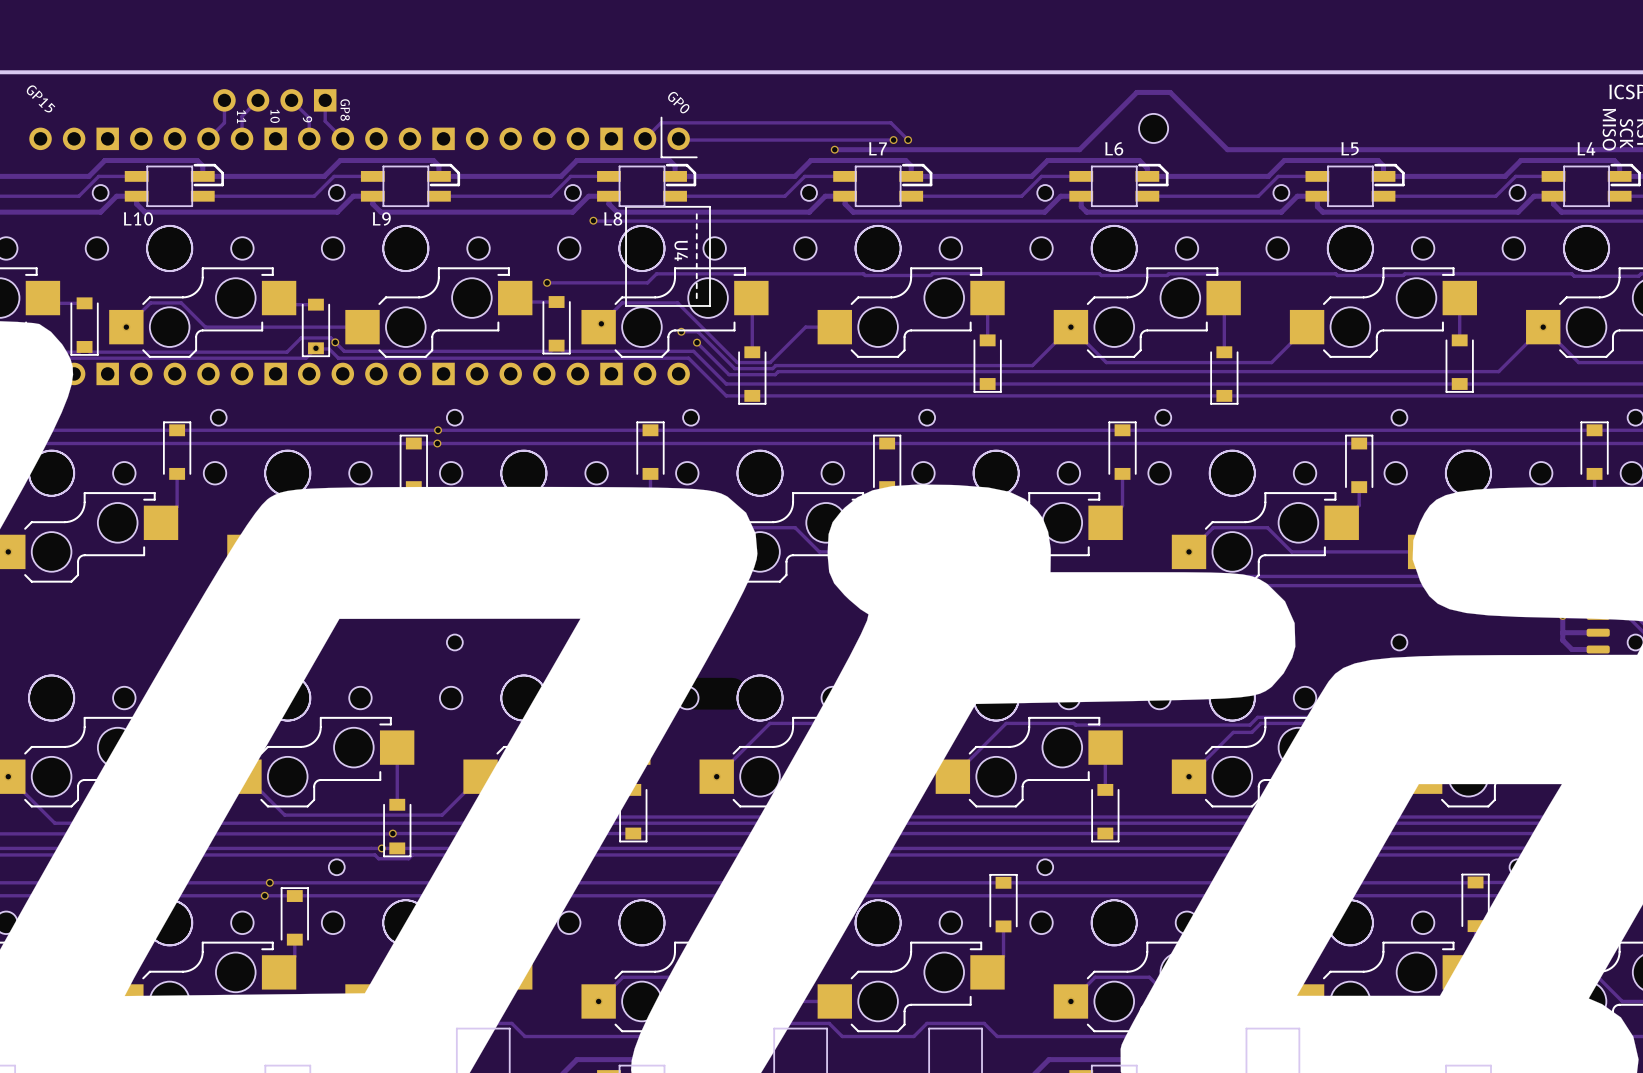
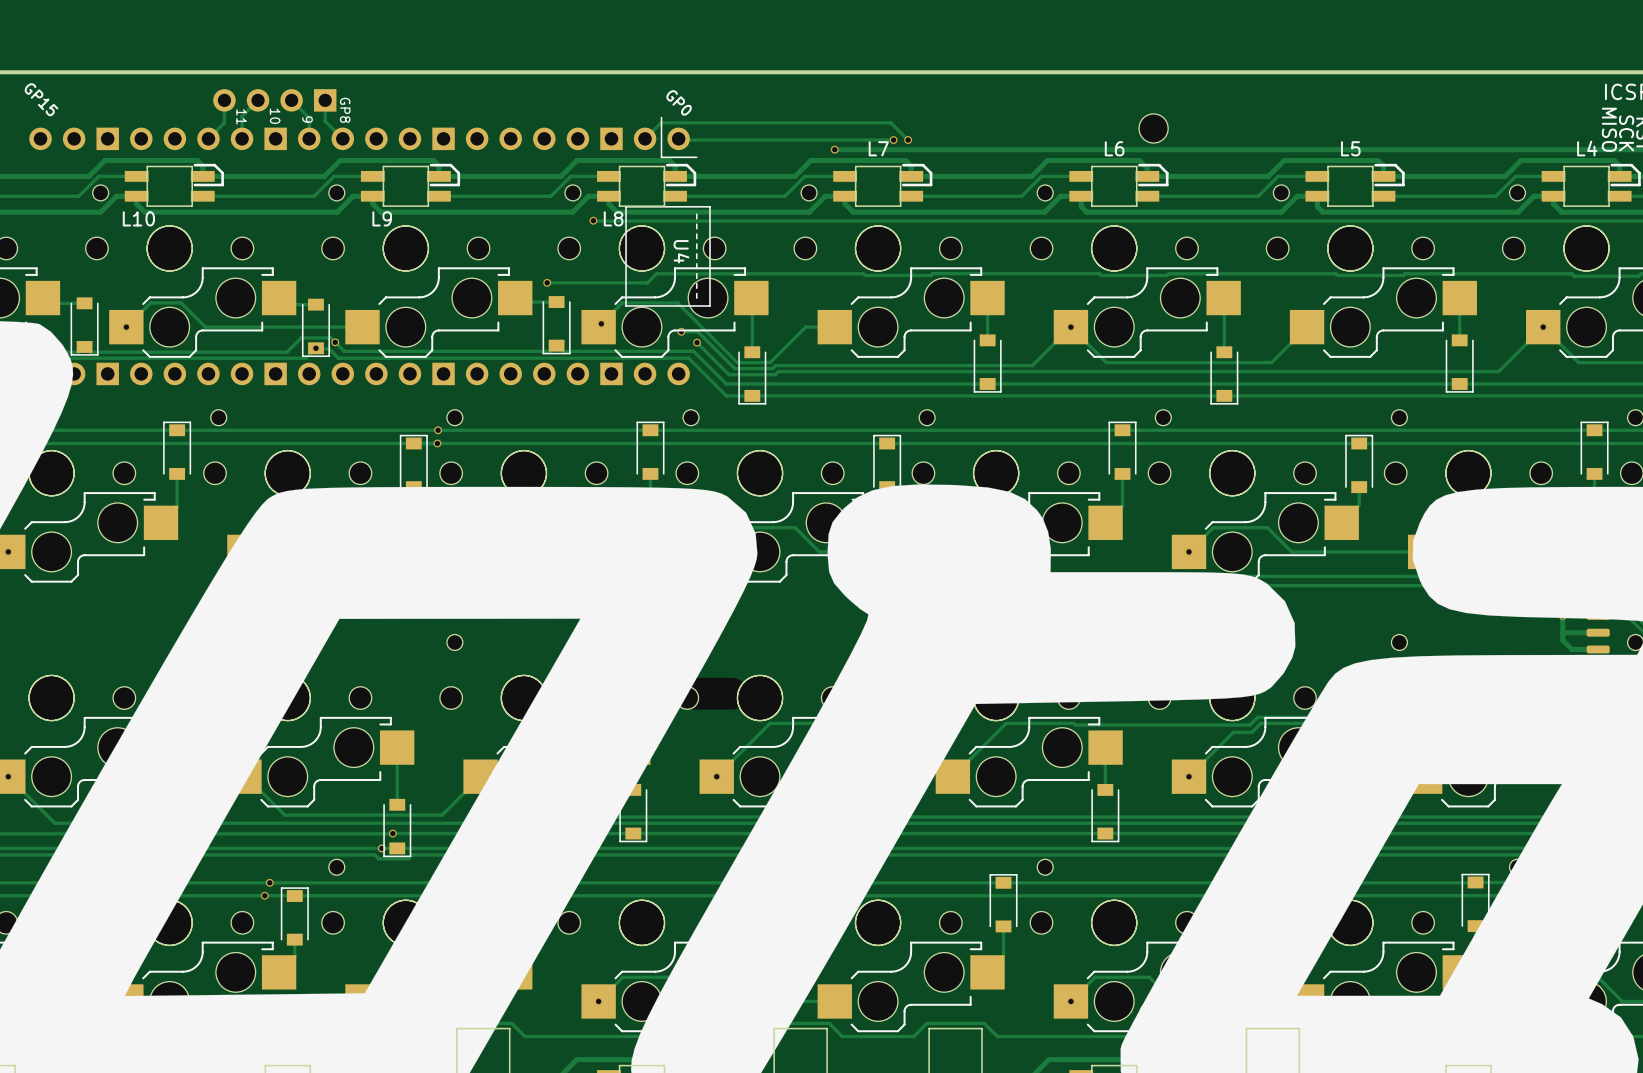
track: (1227, 149) (1170, 92) (1136, 92) (1079, 149) -> (1227, 149) (1079, 149)

